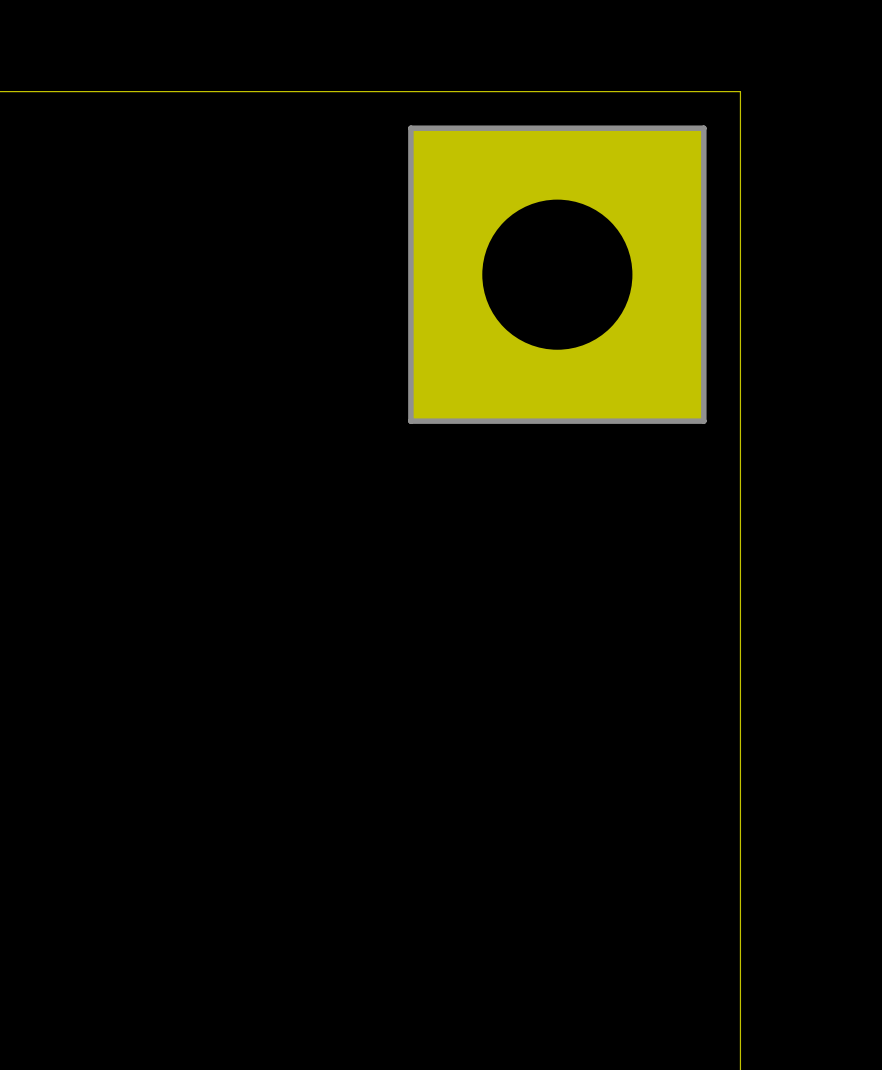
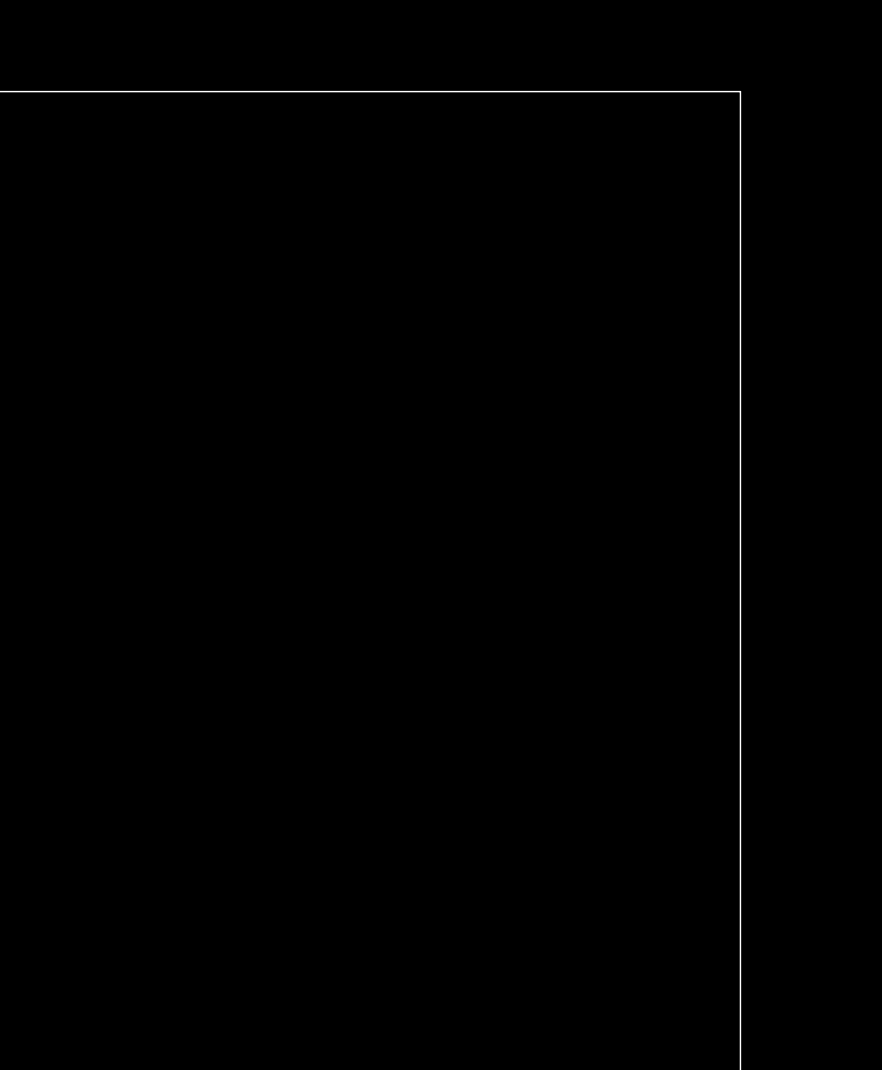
part: (557, 274) -> none

